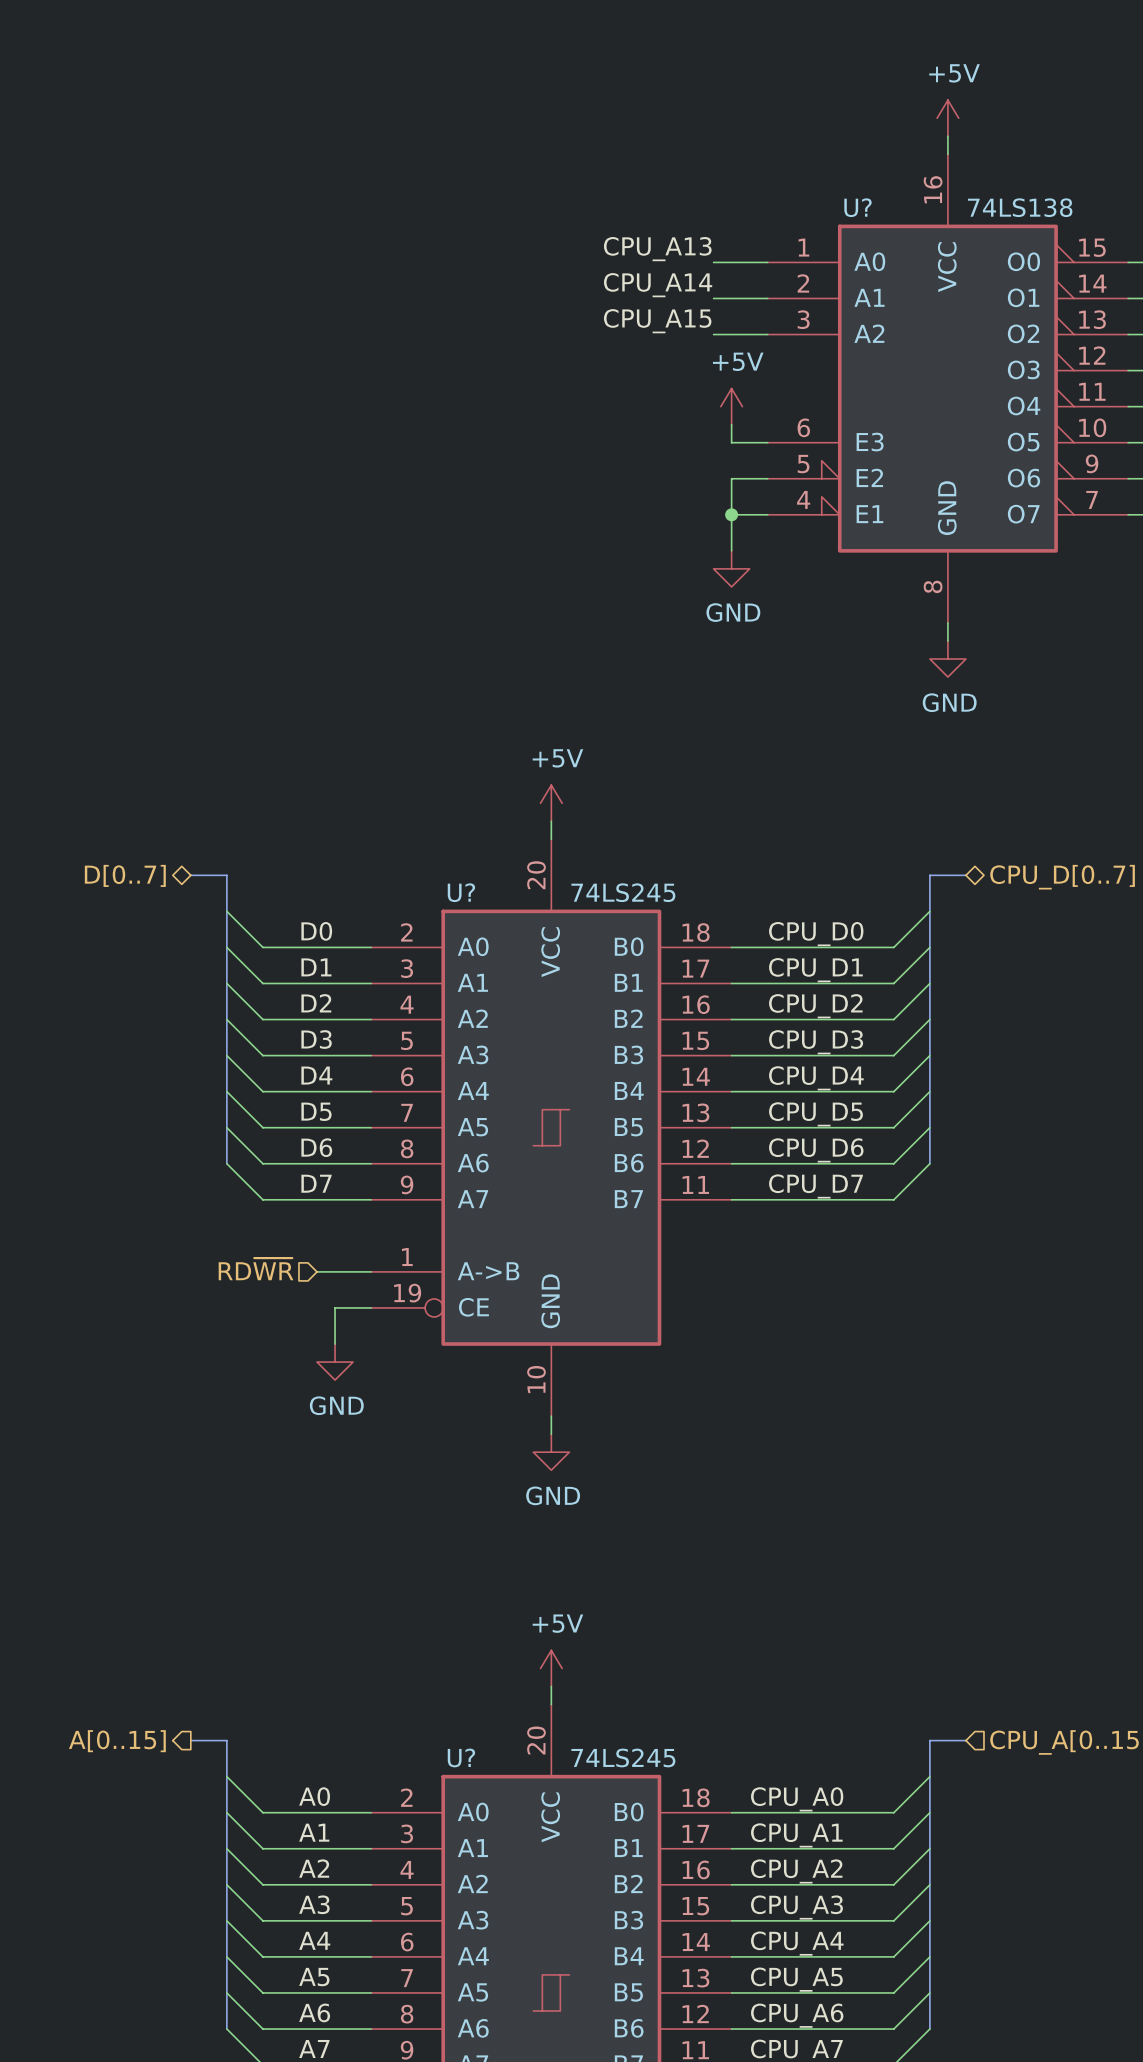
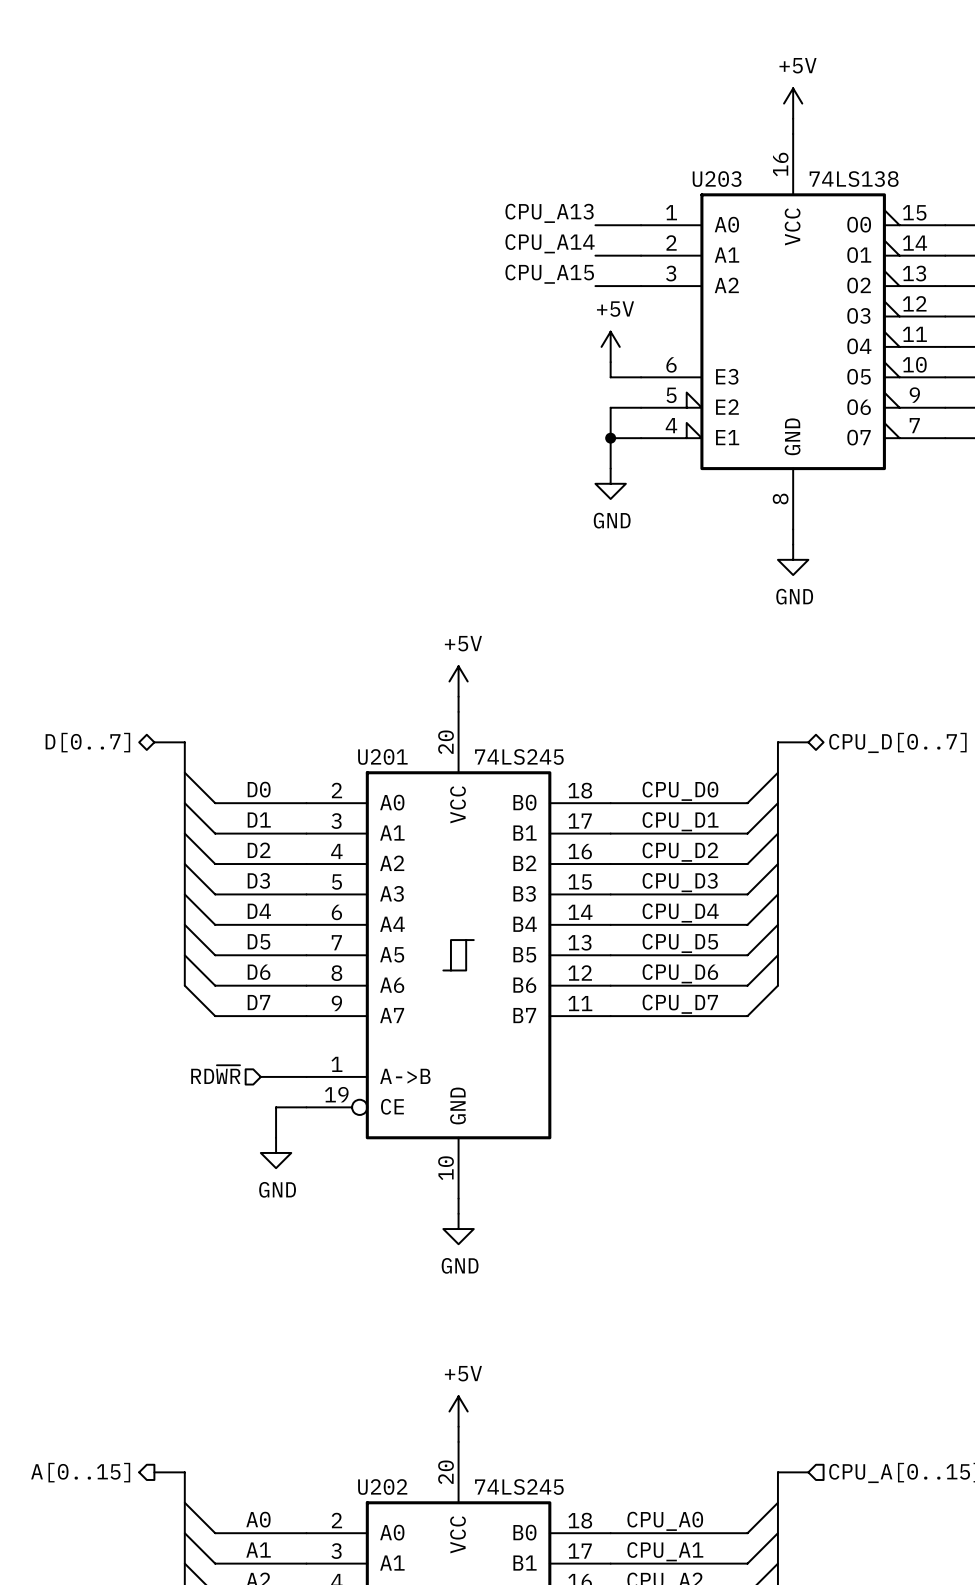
U? name: U? (858, 207) -> U203 (717, 179)
U? name: U? (461, 892) -> U201 (382, 756)
U? name: U? (461, 1757) -> U202 (382, 1487)

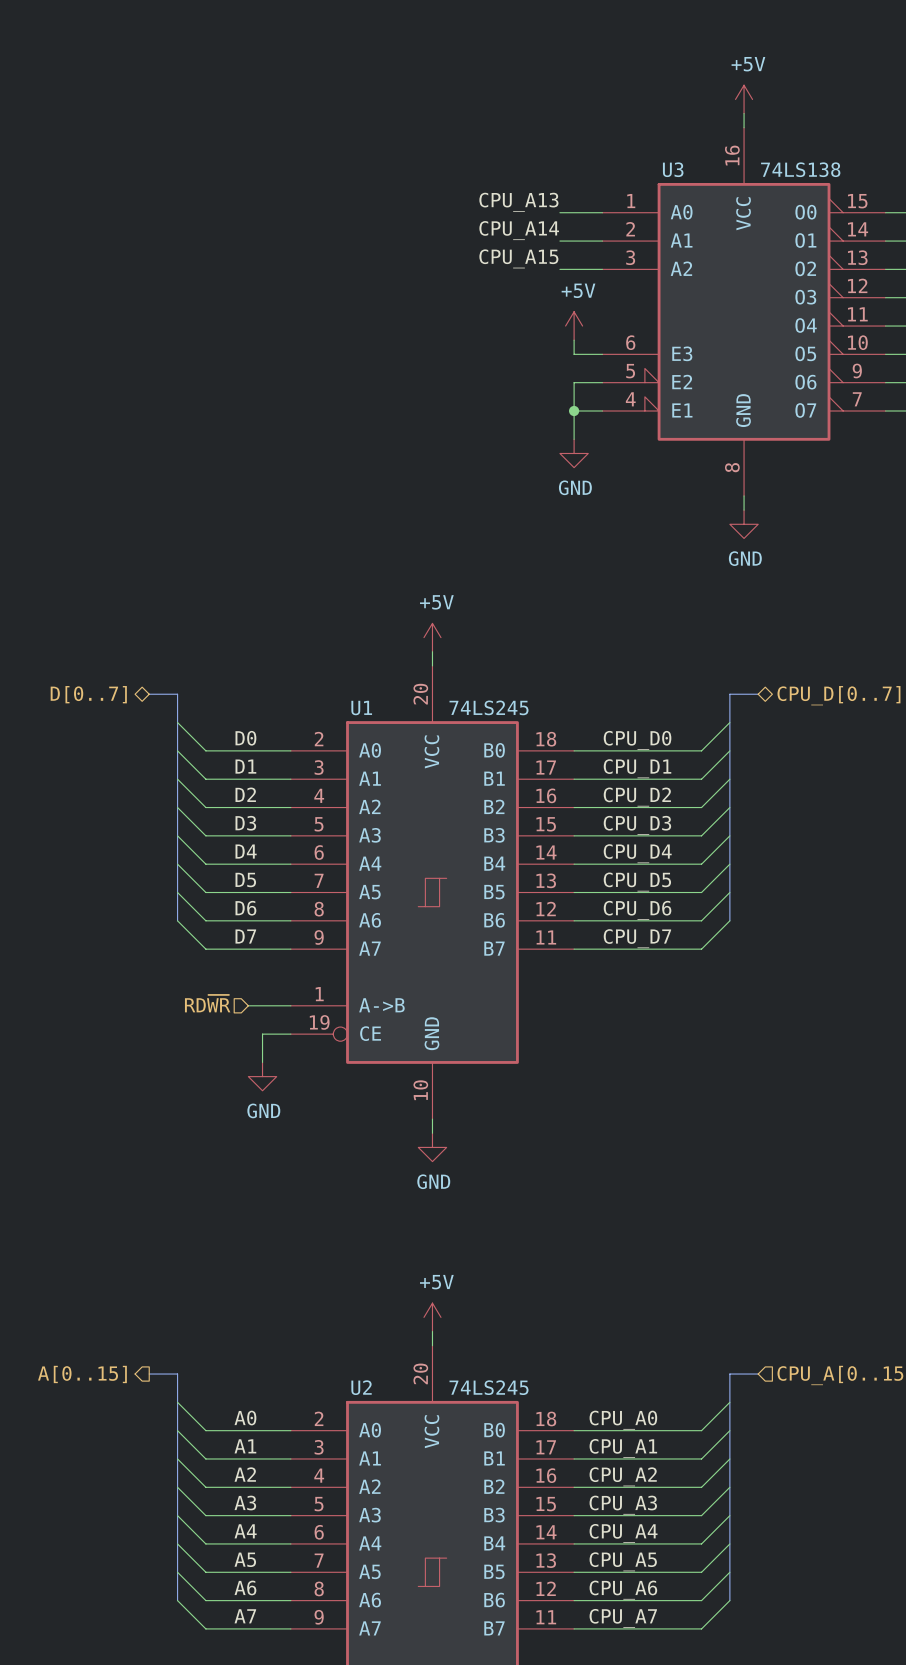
U203 name: U203 (717, 179) -> U3 (673, 169)
U201 name: U201 (382, 756) -> U1 (361, 708)
U202 name: U202 (382, 1487) -> U2 (361, 1387)

